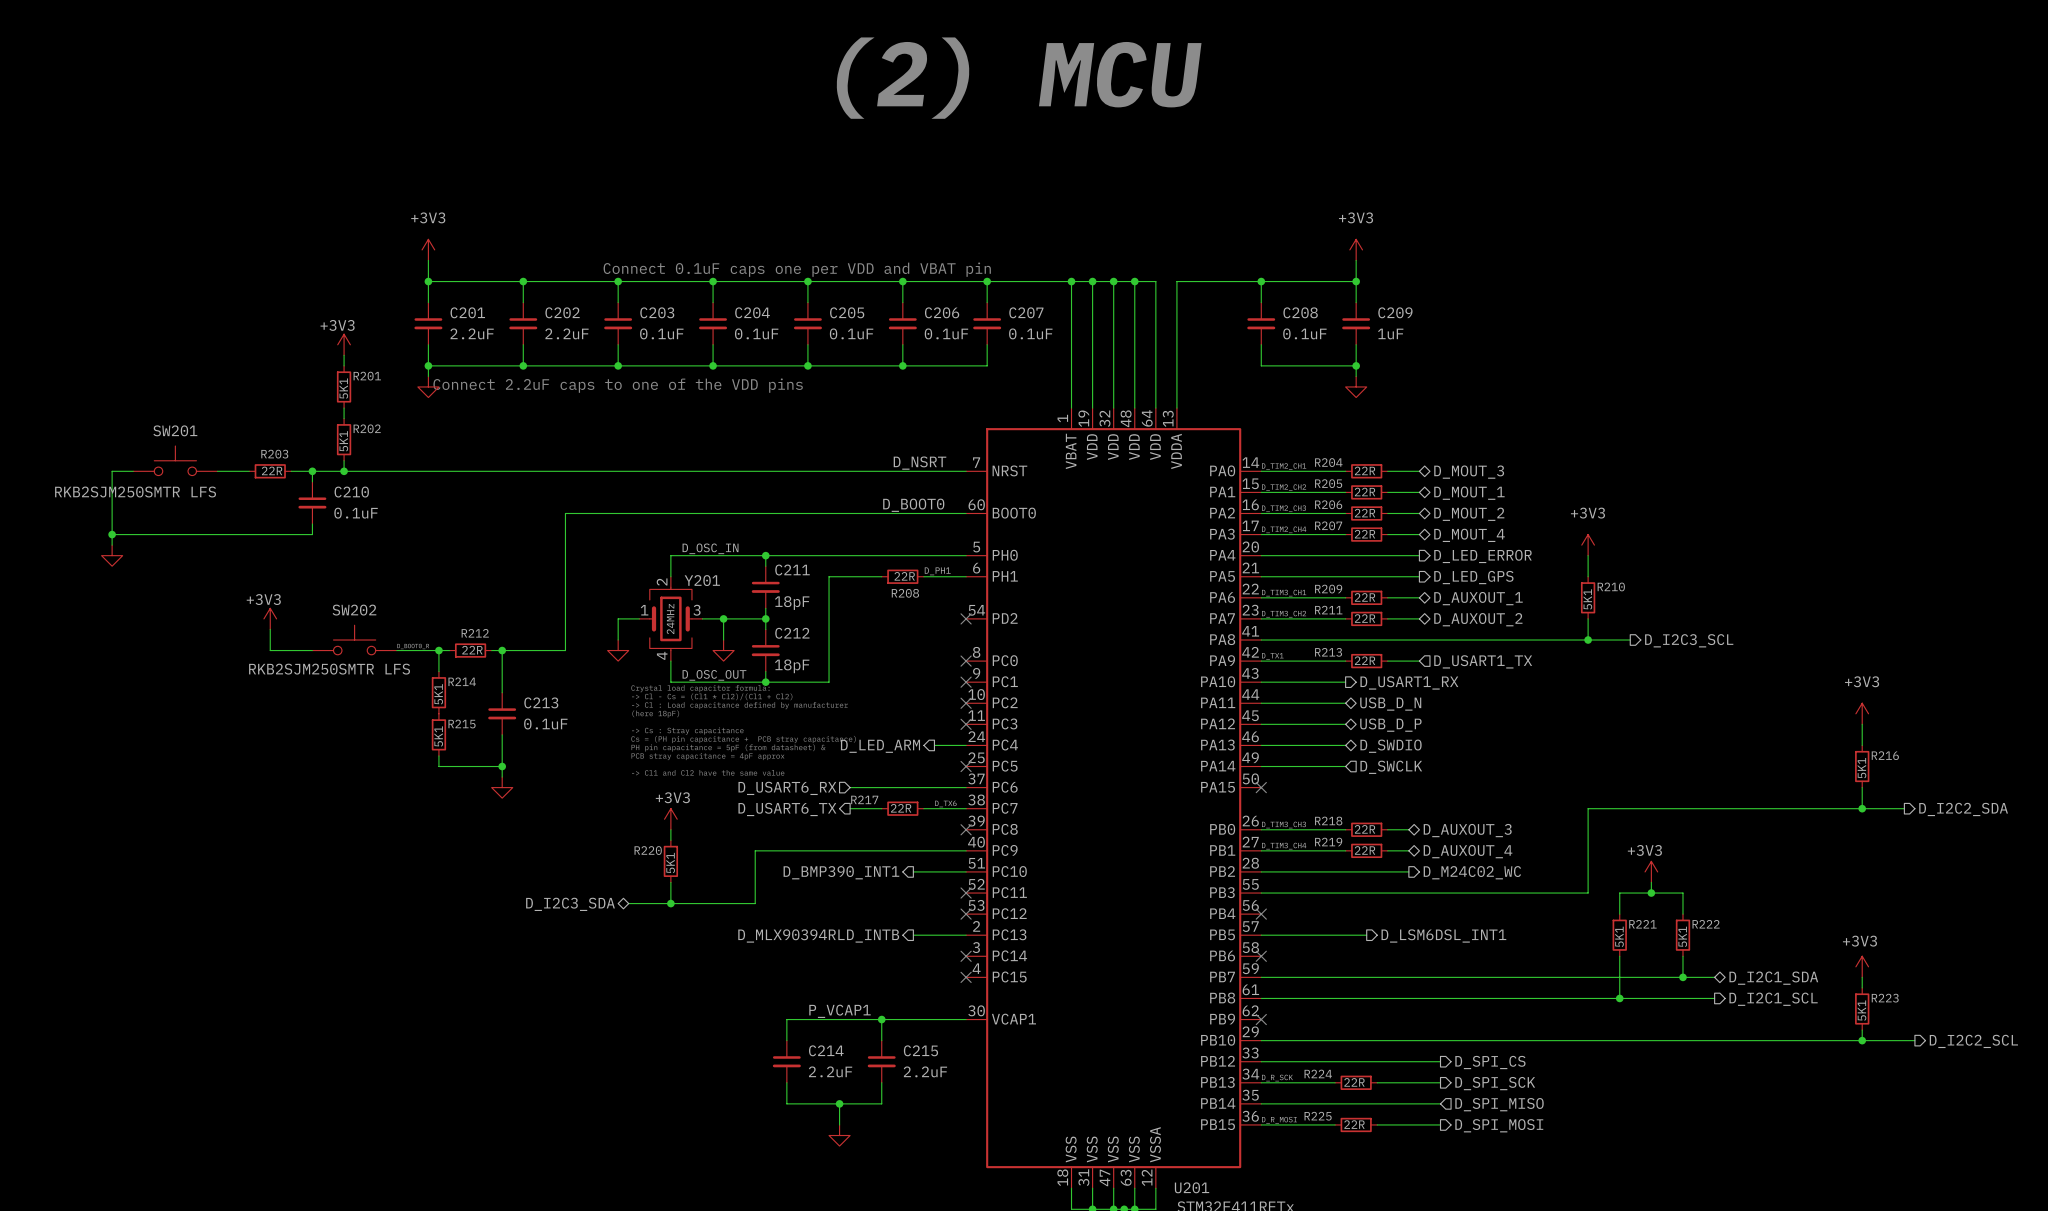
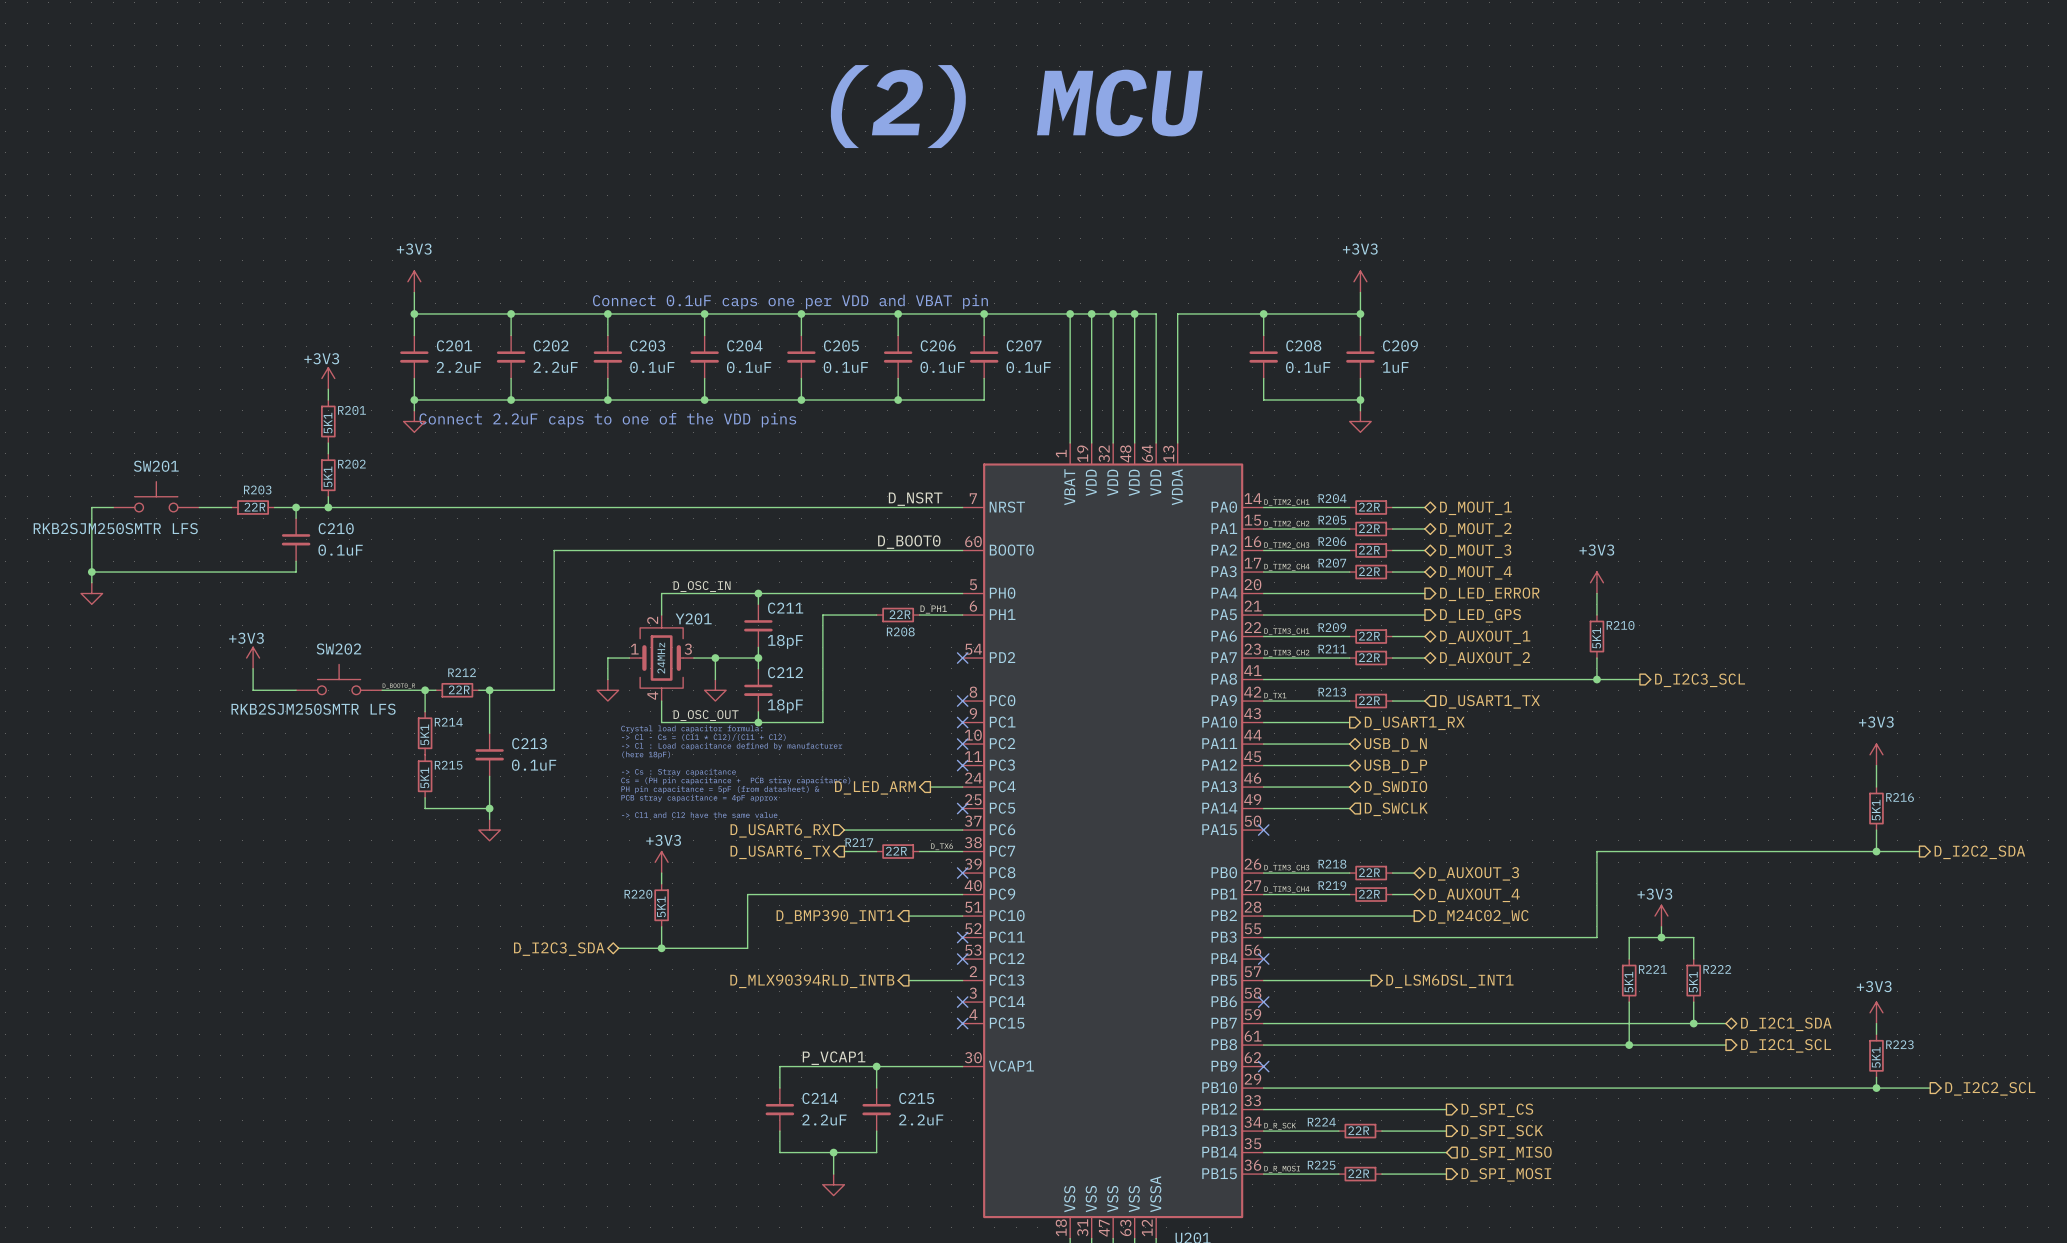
hierarchical label: D_MOUT_3 (1469, 472) -> D_MOUT_1 (1475, 508)
hierarchical label: D_MOUT_1 (1469, 493) -> D_MOUT_2 (1475, 529)
hierarchical label: D_MOUT_2 (1469, 514) -> D_MOUT_3 (1475, 551)

